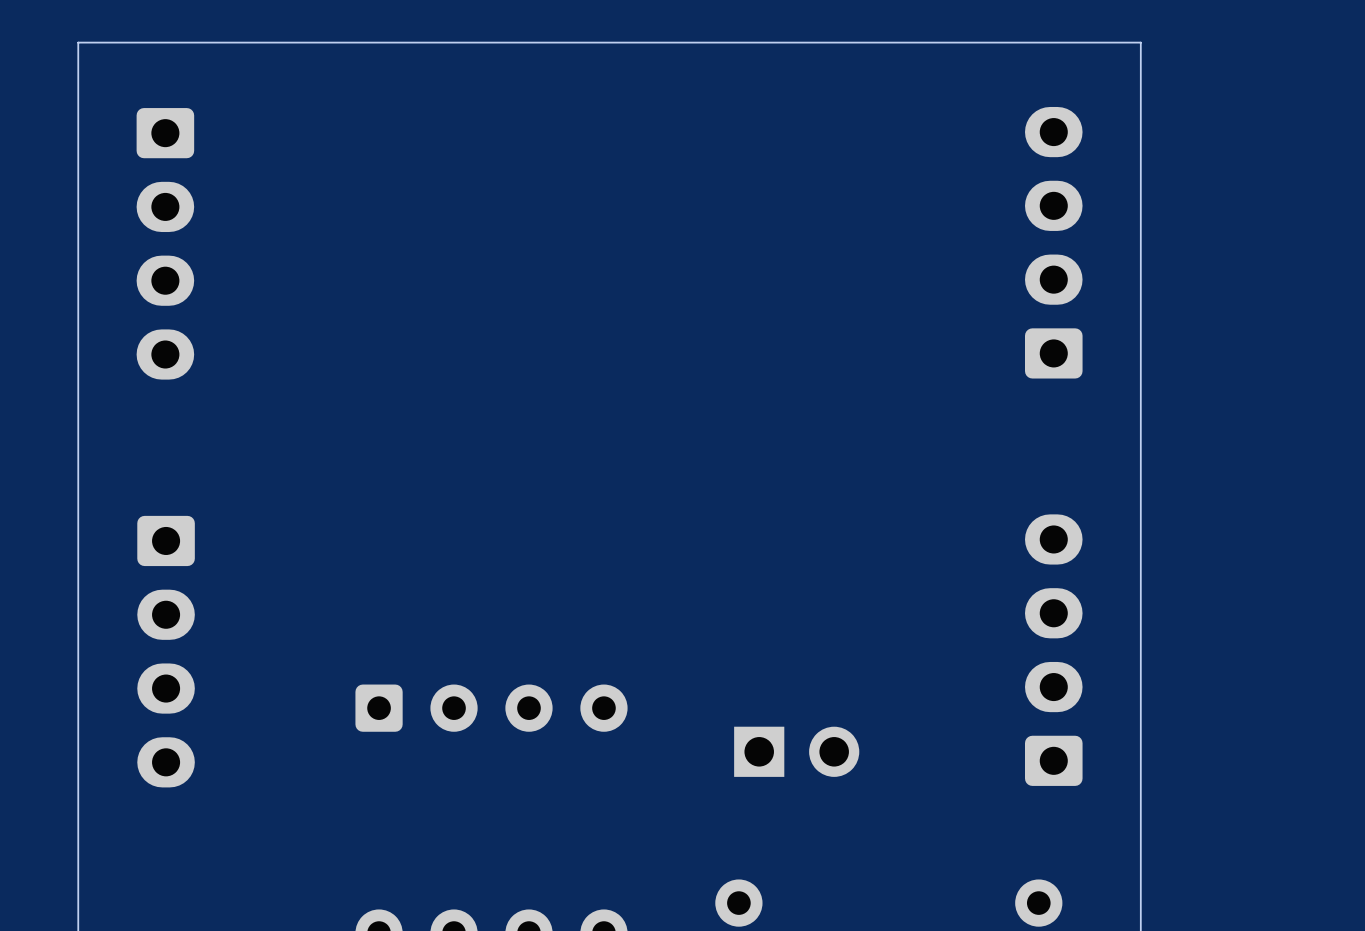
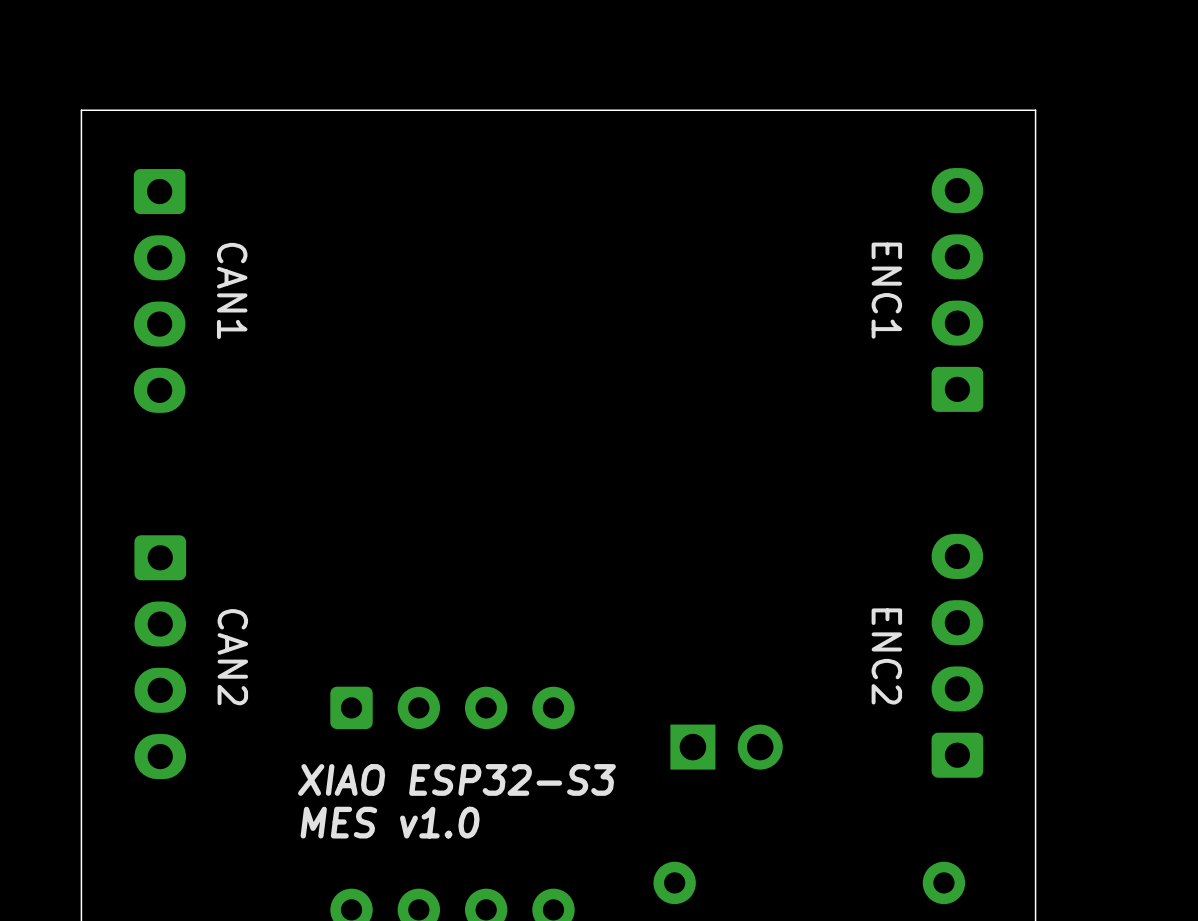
CAN1 name: none -> CAN1 (232, 290)
ENC1 name: none -> ENC1 (886, 290)
ENC2 name: none -> ENC2 (886, 656)
CAN2 name: none -> CAN2 (232, 657)
text: none -> XIAO ESP32-S3 (456, 779)
text: none -> MES v1.0 (390, 822)

